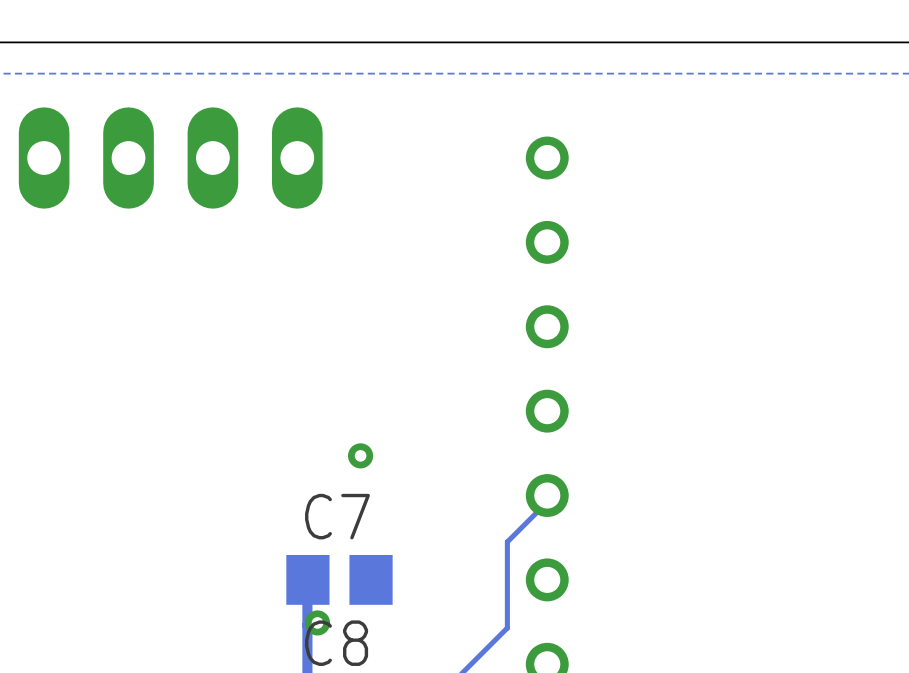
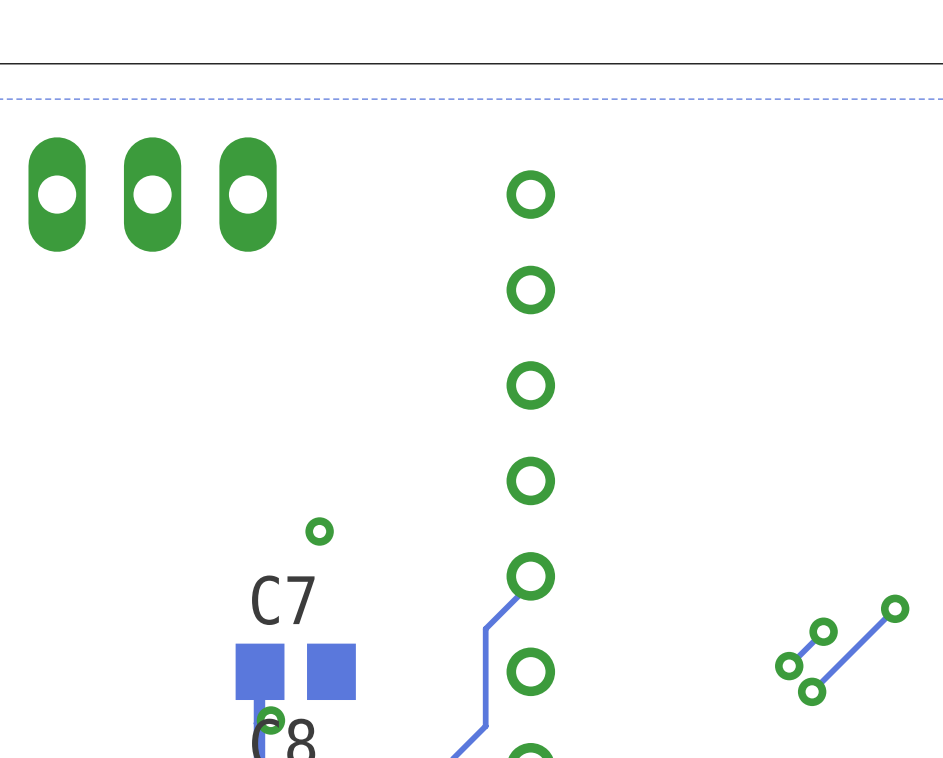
track: none -> (895, 608) (812, 691)
via: none -> (895, 608)
track: none -> (823, 631) (789, 666)
via: none -> (823, 631)
via: none -> (789, 666)
via: none -> (812, 691)

